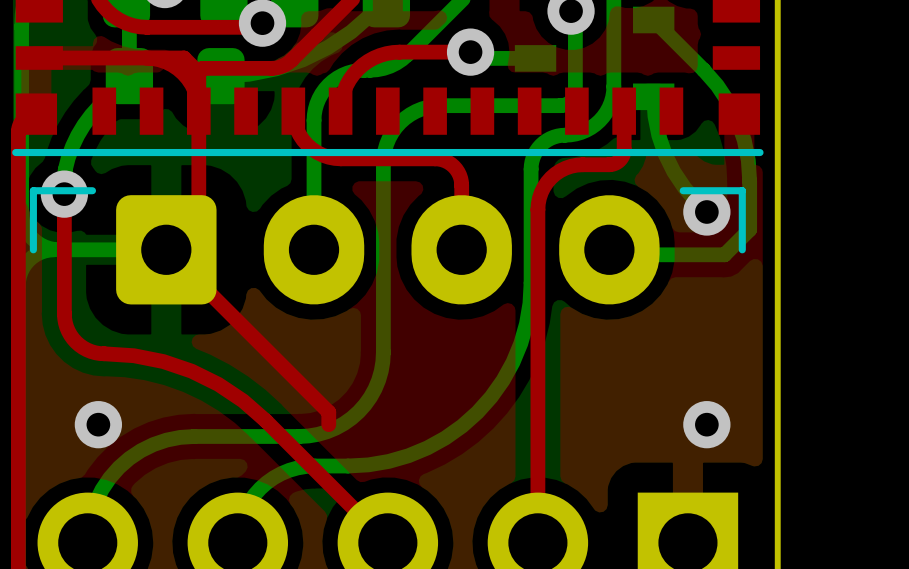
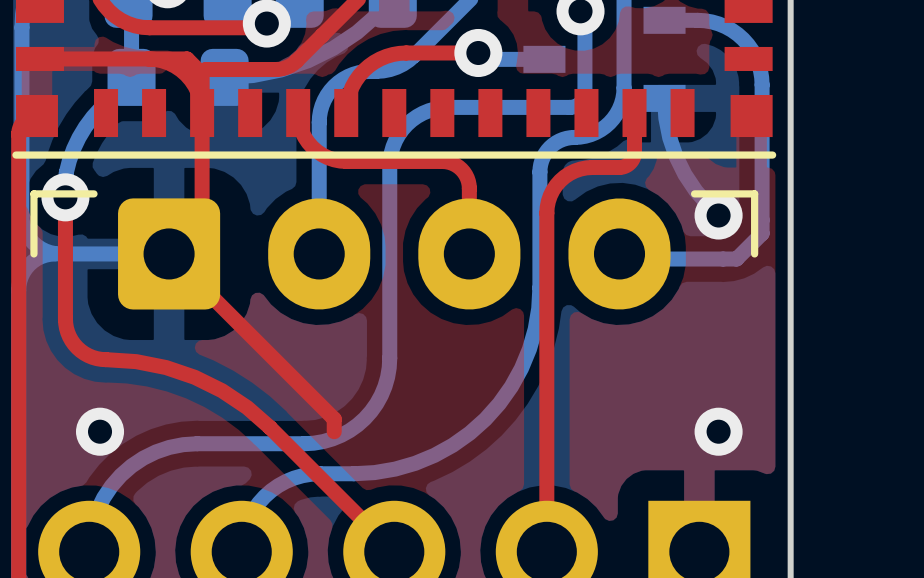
bottom track: (653, 20) (703, 69) (728, 102) (744, 140) (749, 181) -> (664, 20) (704, 20) (718, 23) (737, 34) (752, 50) (758, 63) (761, 77) (762, 184)

